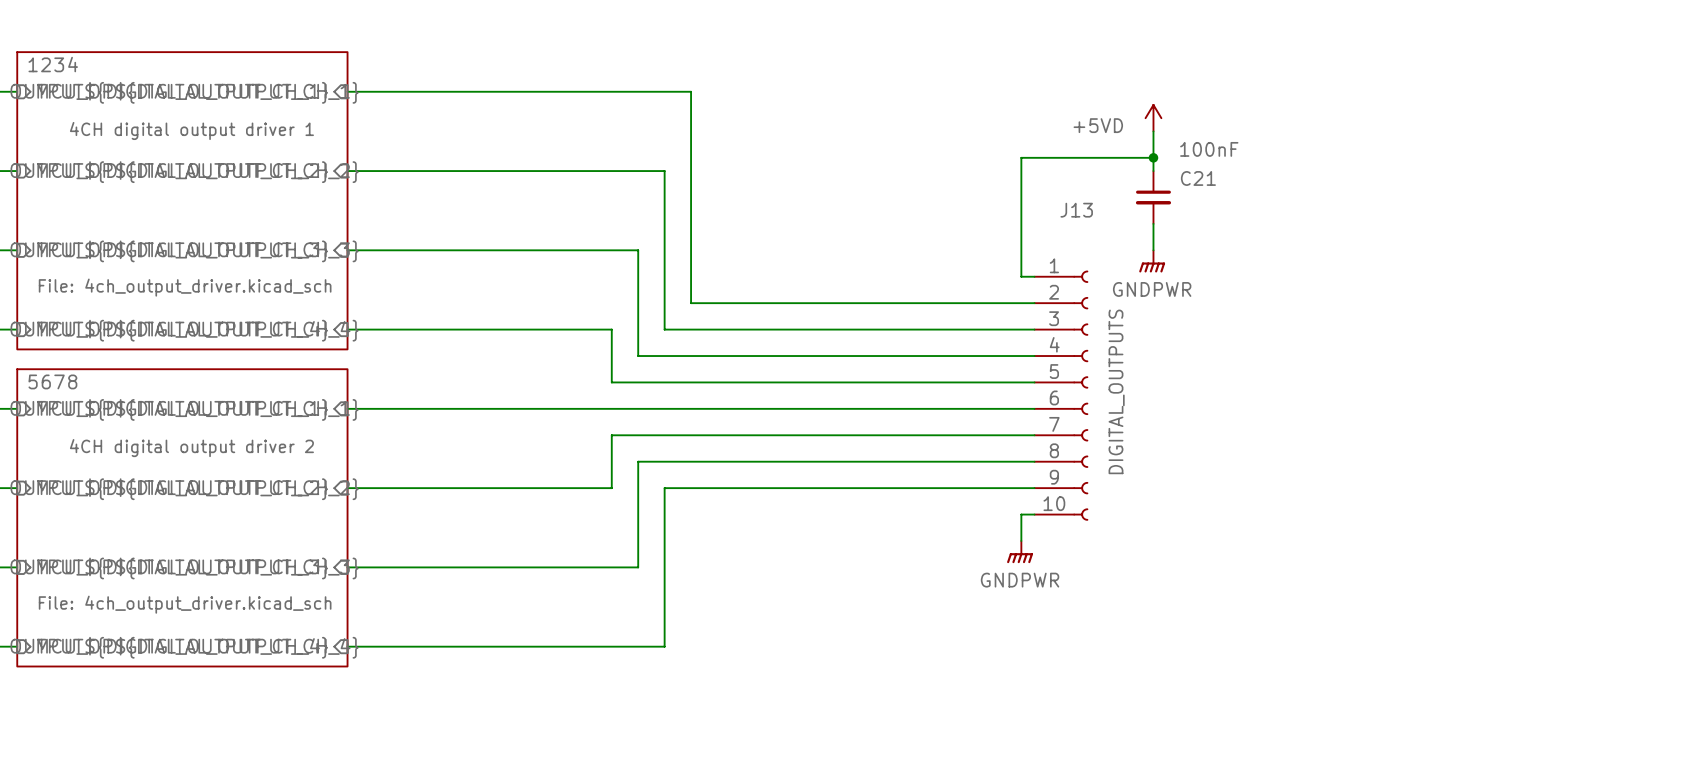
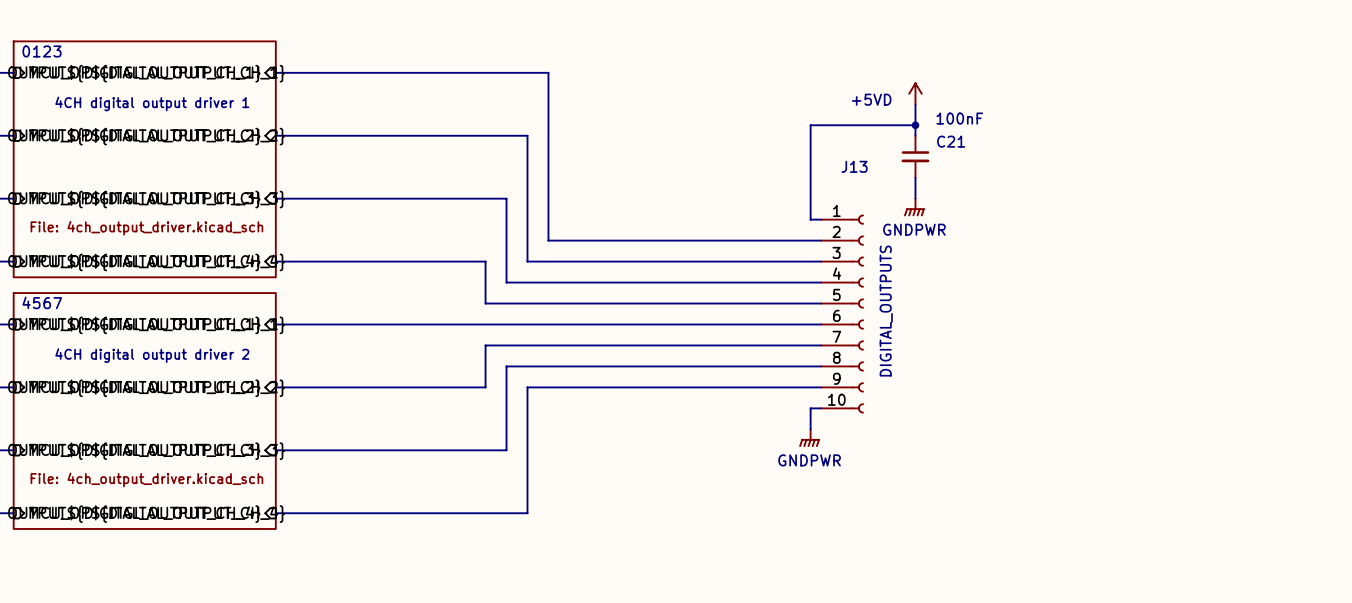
sheet 4CH digital output driver 1 text: 1 (33, 64) -> 0 (26, 51)
sheet 4CH digital output driver 1 text: 2 (45, 64) -> 1 (36, 51)
sheet 4CH digital output driver 1 text: 3 (59, 64) -> 2 (46, 51)
sheet 4CH digital output driver 1 text: 4 (73, 64) -> 3 (57, 51)
sheet 4CH digital output driver 2 text: 5 (33, 381) -> 4 (26, 302)
sheet 4CH digital output driver 2 text: 6 (46, 381) -> 5 (36, 303)
sheet 4CH digital output driver 2 text: 7 (59, 381) -> 6 (47, 303)
sheet 4CH digital output driver 2 text: 8 (72, 381) -> 7 (57, 303)

